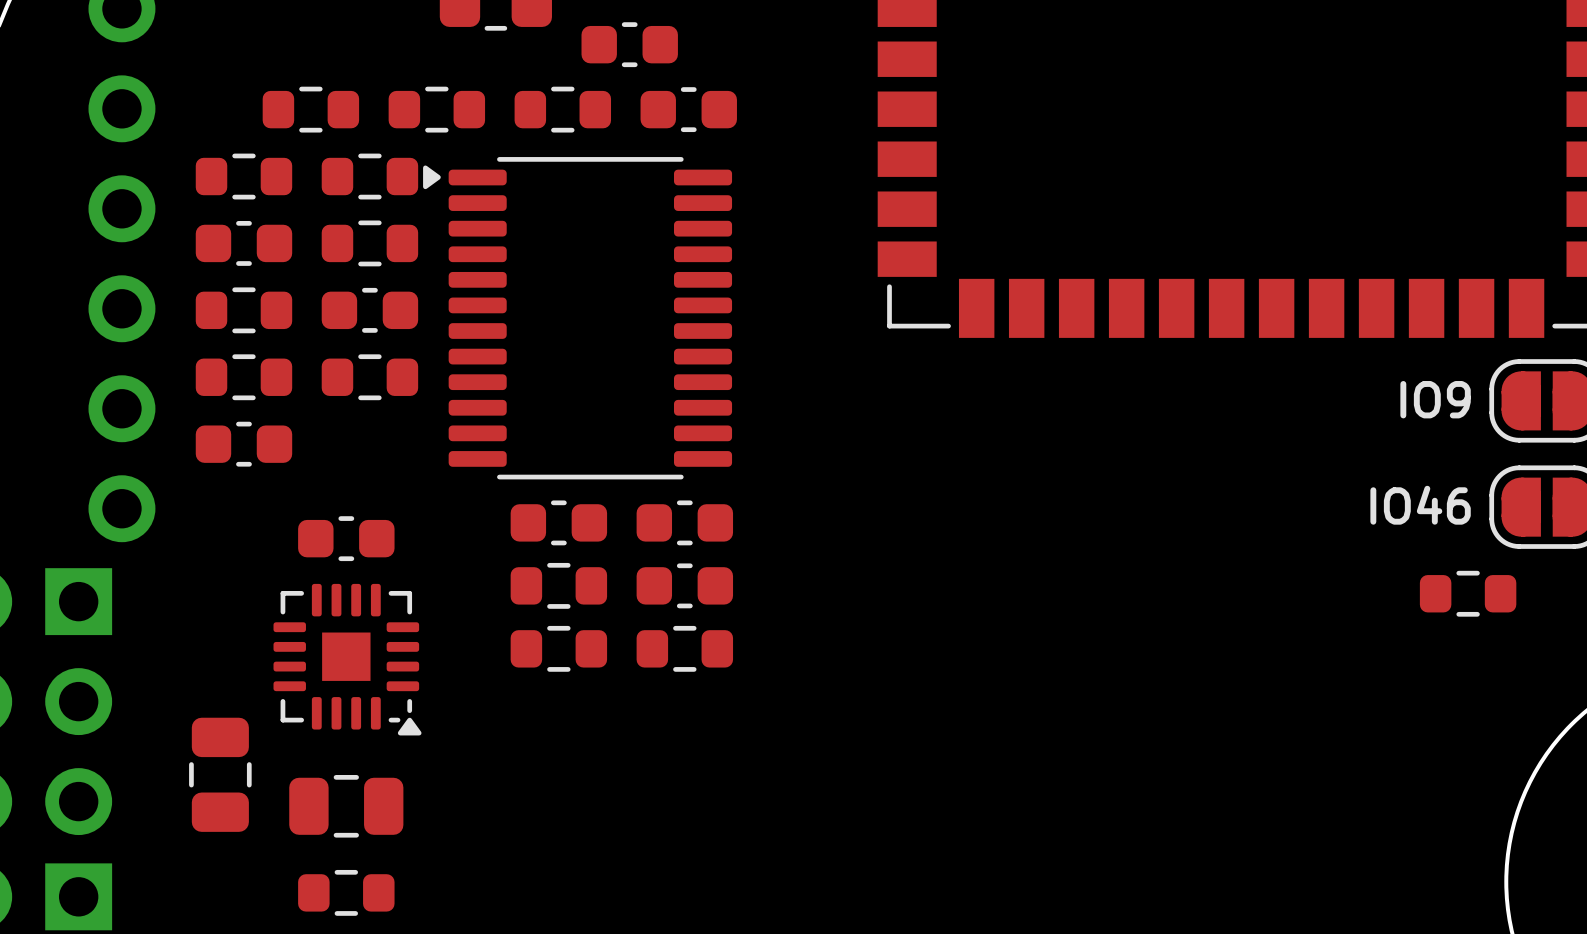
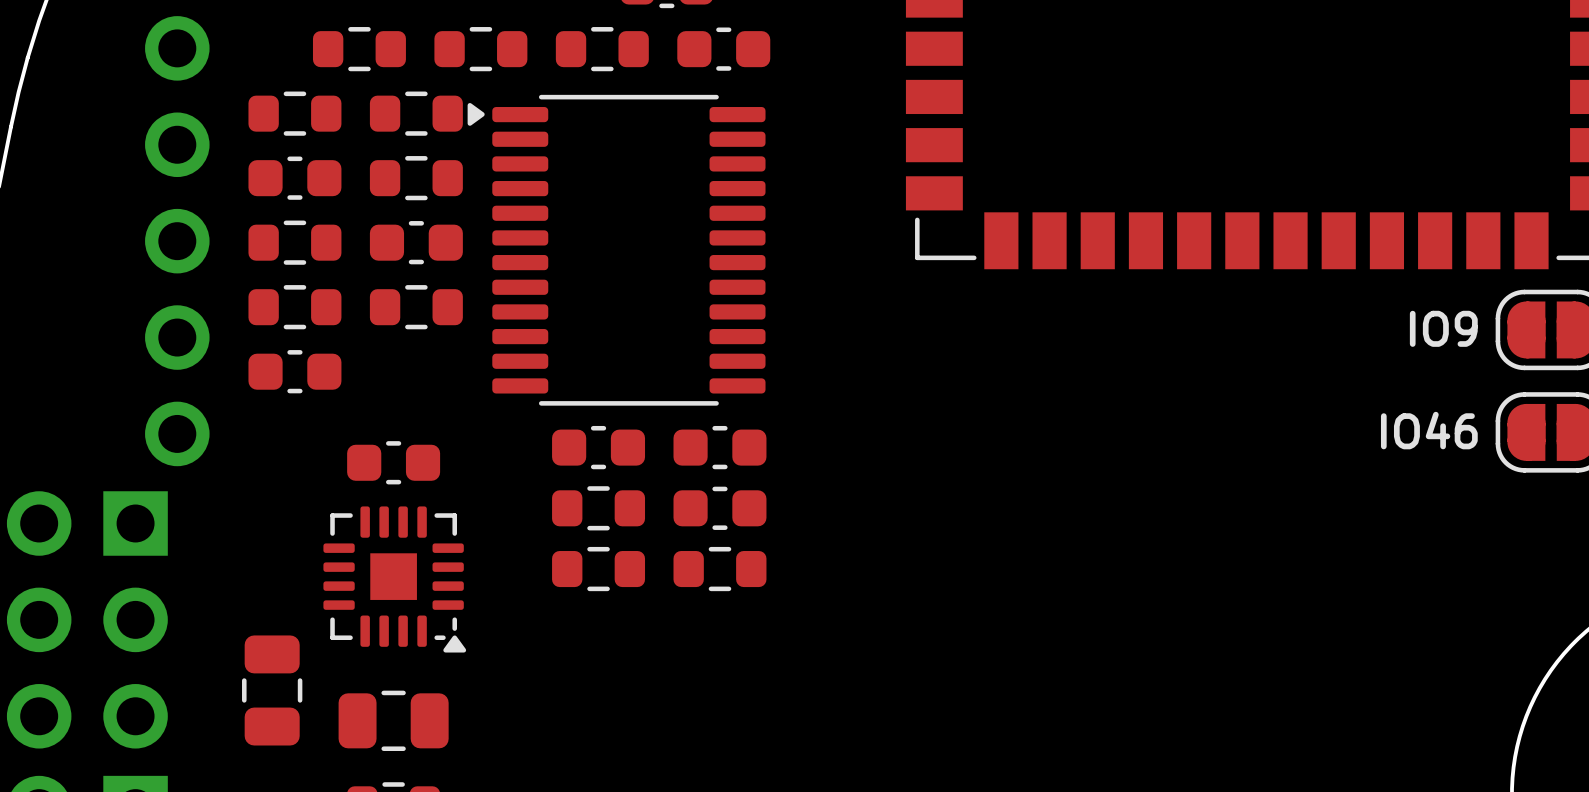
part: (1468, 593) -> none

